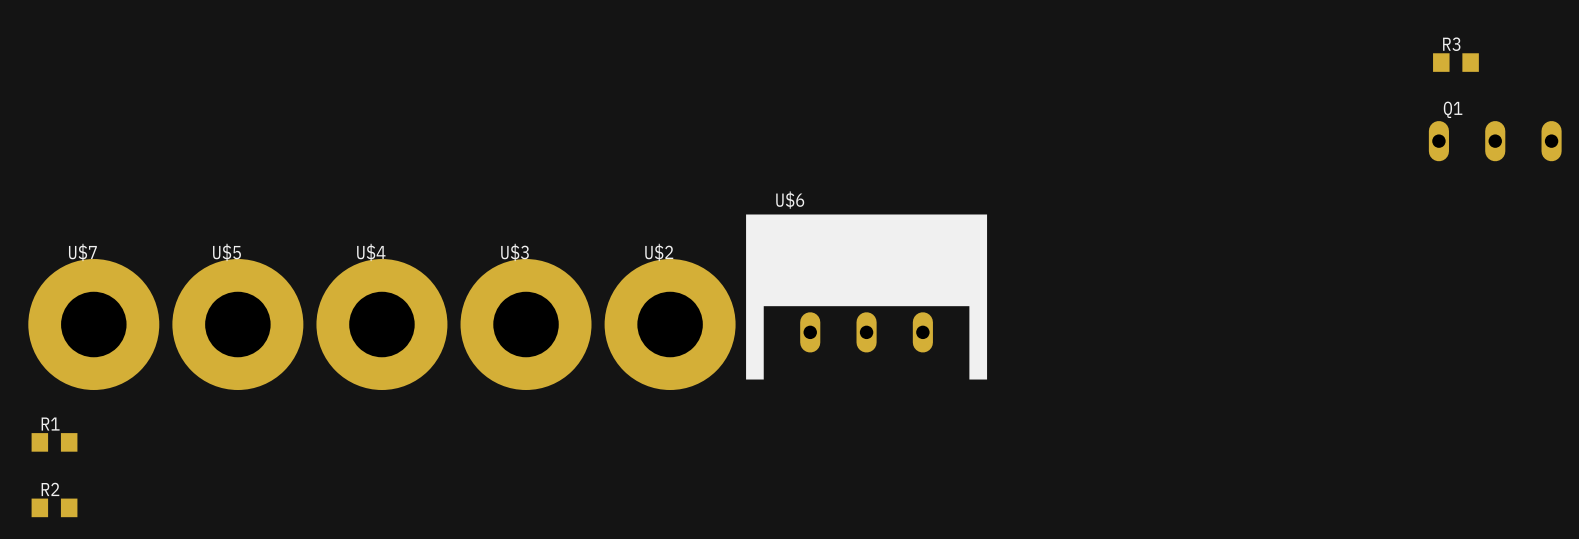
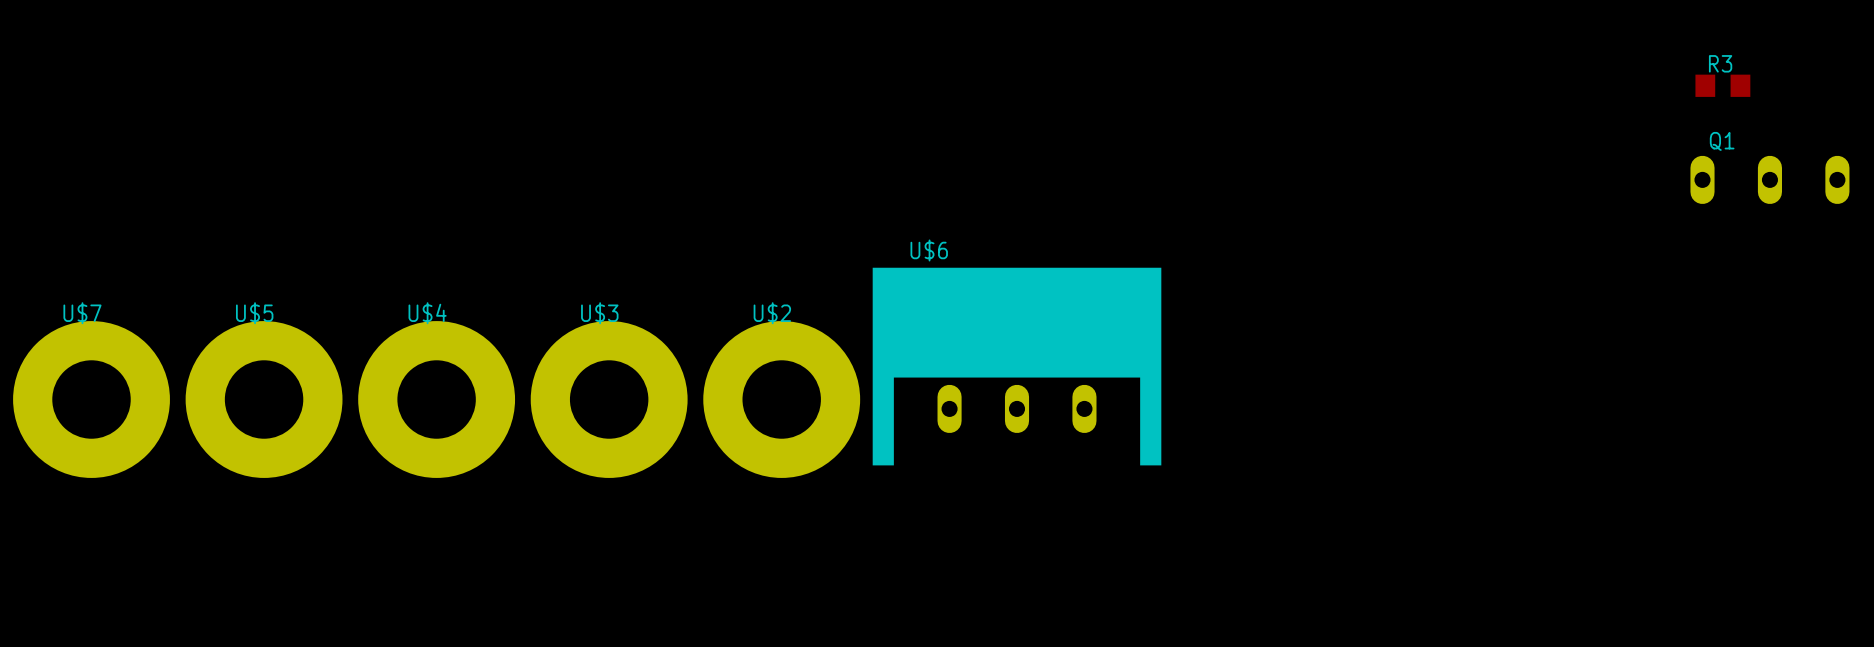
R1: (54, 442) -> none
R2: (54, 507) -> none

